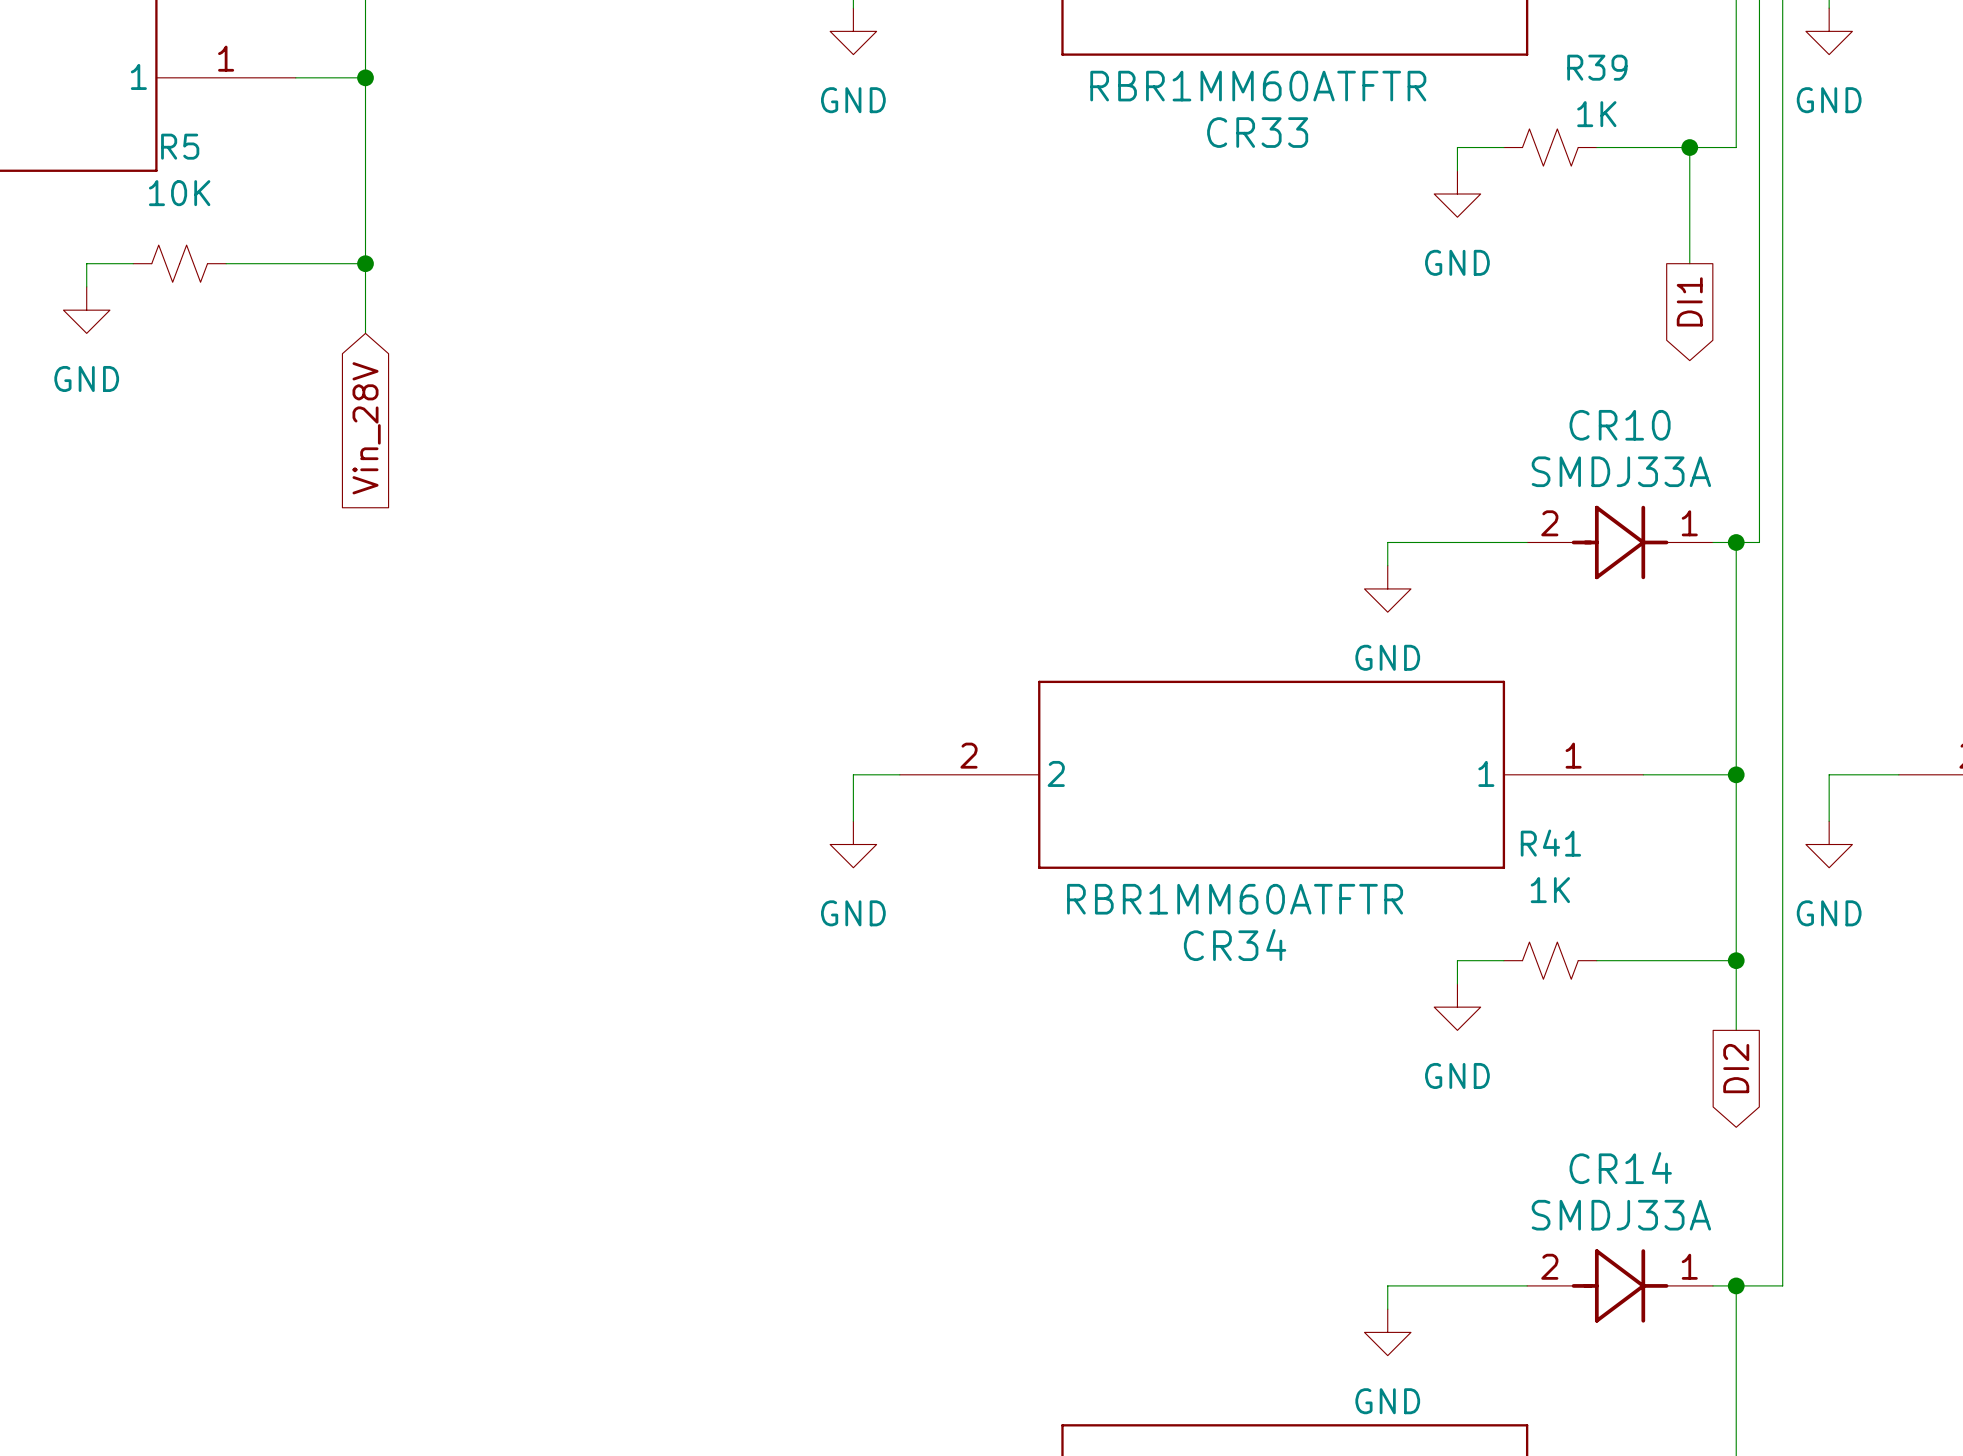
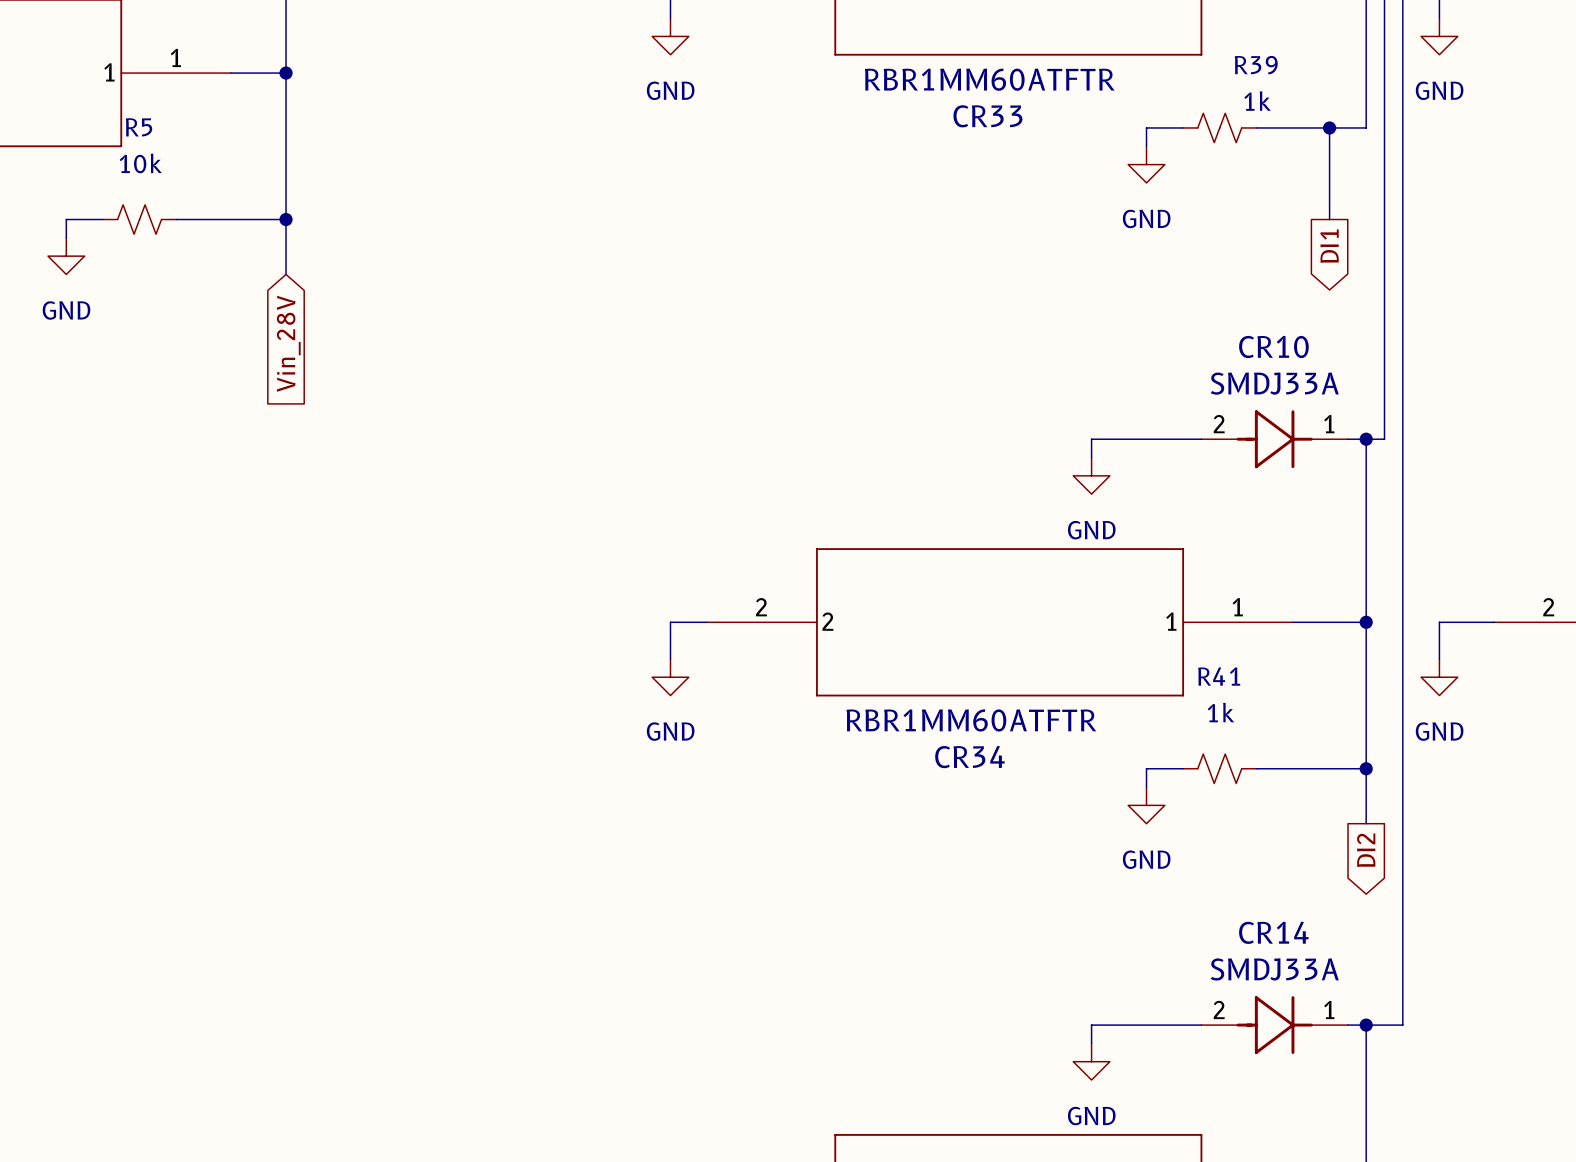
R39 value: 1K (1596, 114) -> 1k (1257, 101)
R5 value: 10K (179, 193) -> 10k (140, 163)
R41 value: 1K (1550, 890) -> 1k (1220, 712)

